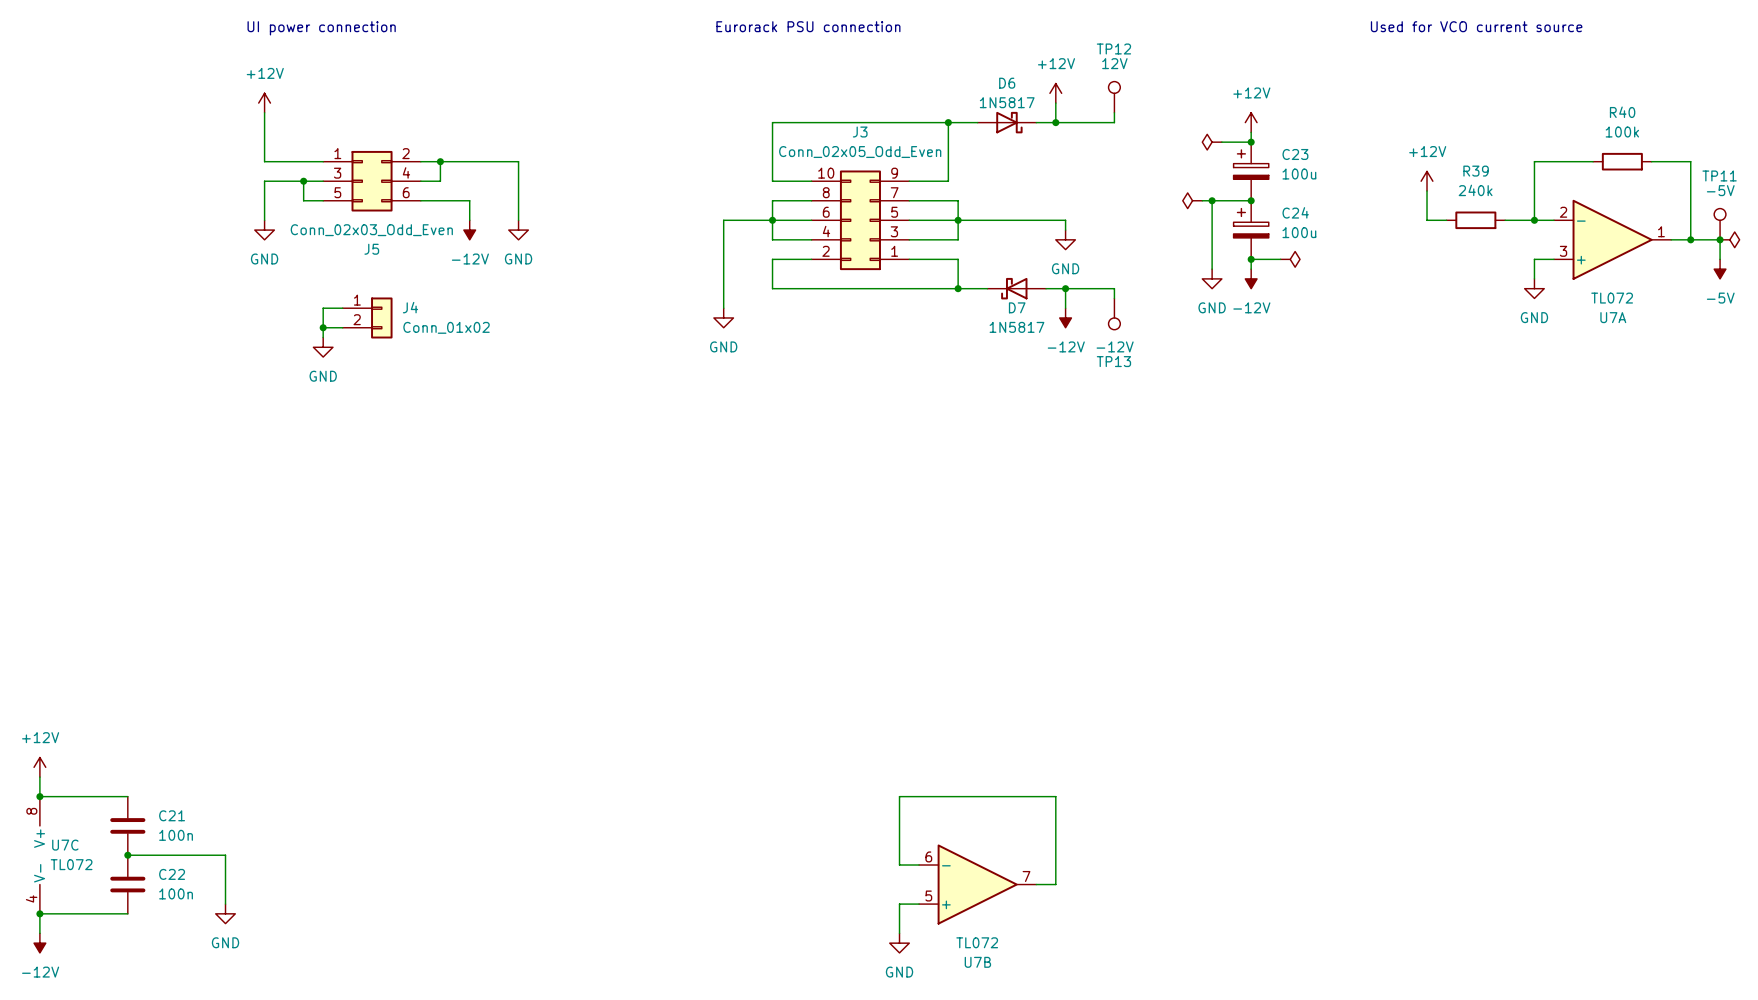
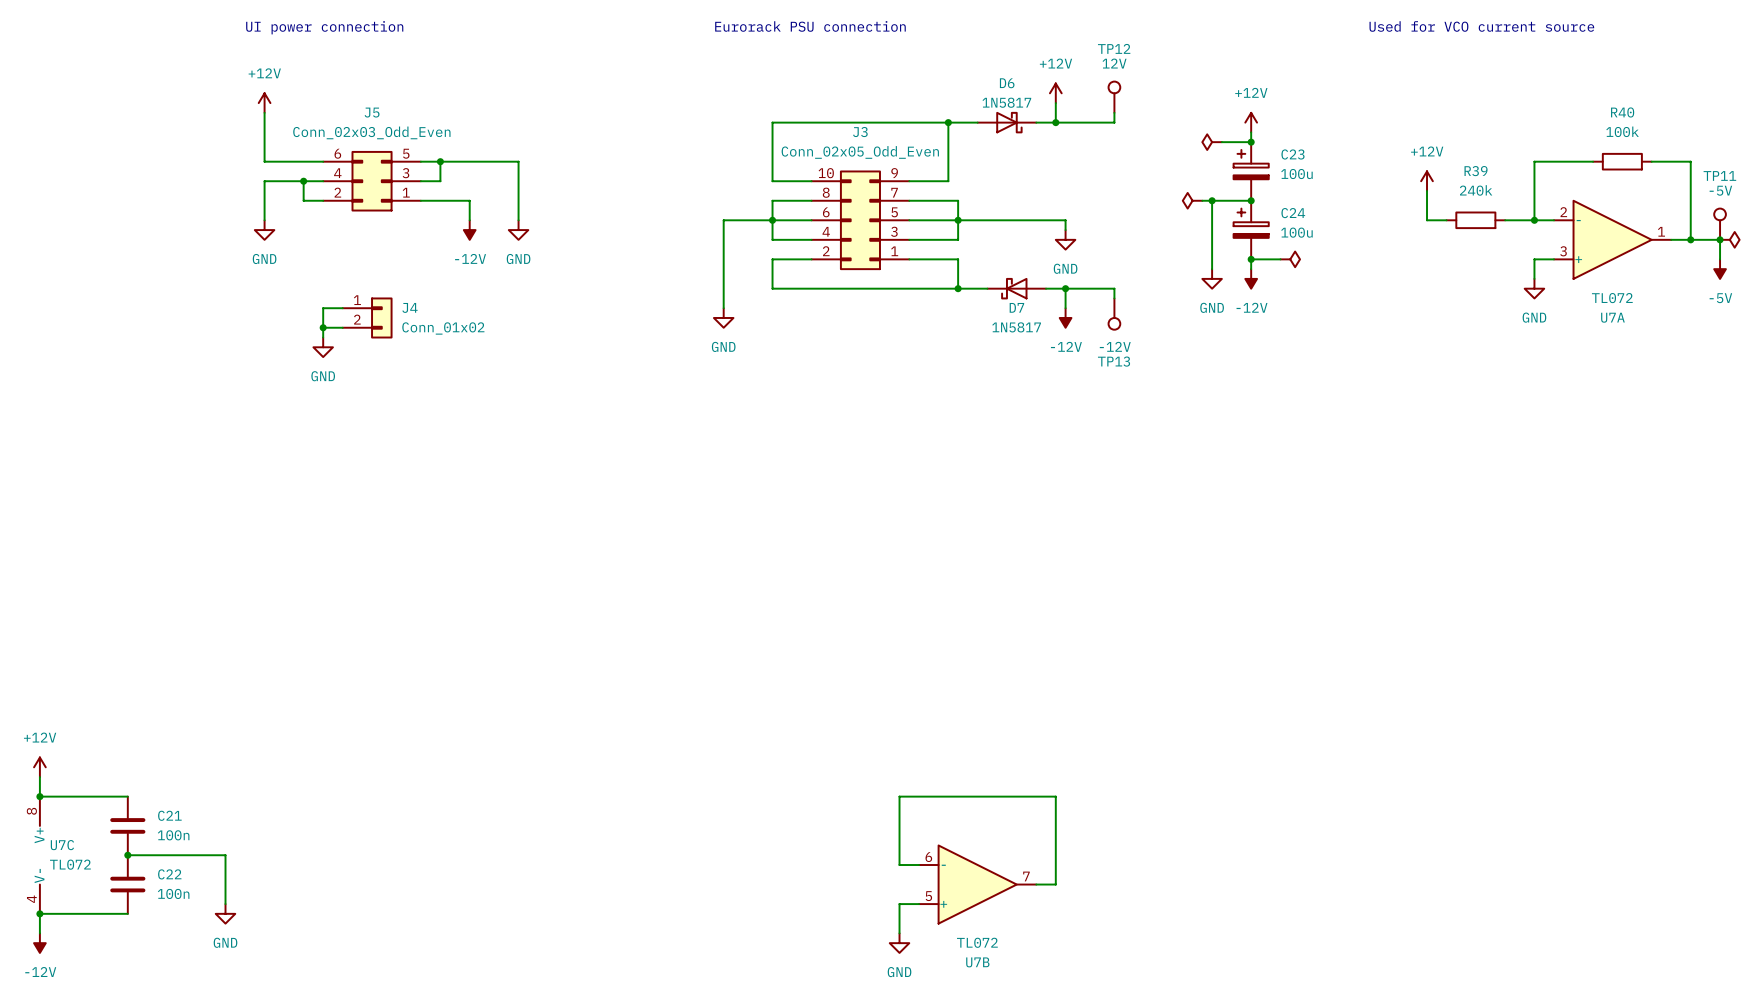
J5 rotation: 0° (372, 181) -> 180° (372, 181)

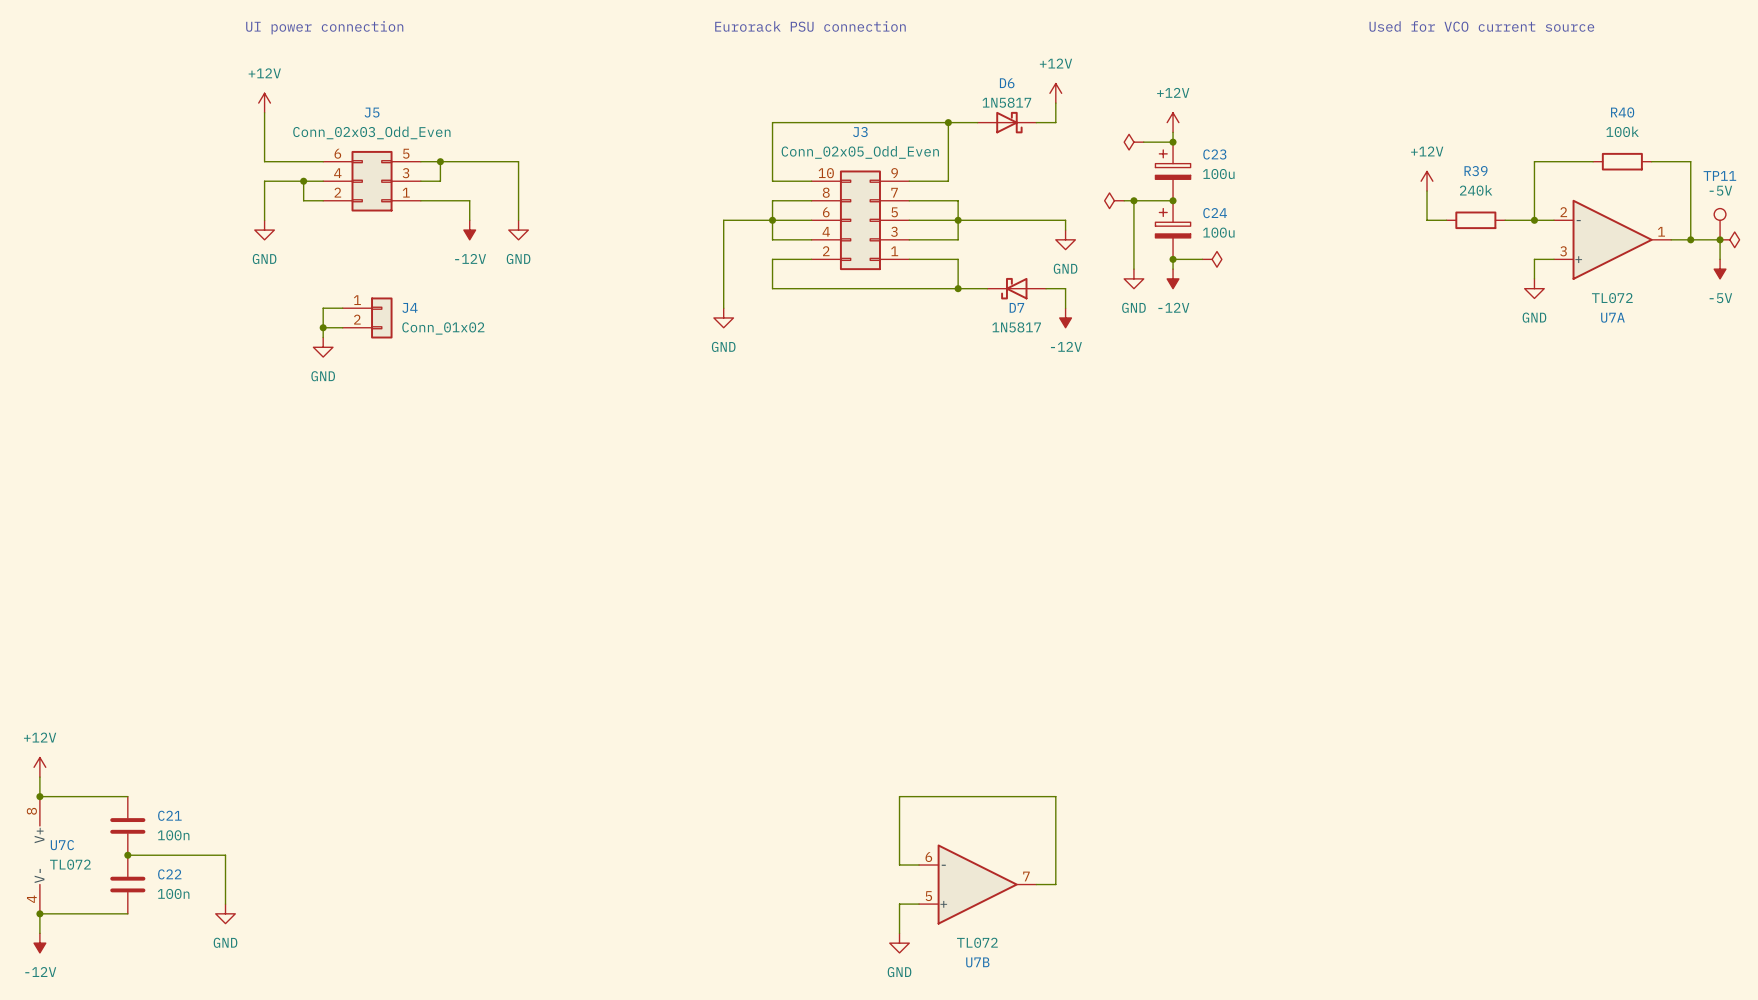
TP12: 12V (1114, 97) -> none
wire: (1114, 112) (1114, 122) (1055, 122) -> none
junction: (1055, 122) -> none
power symbol position: +12V (1251, 122) -> +12V (1173, 122)
wire: (1251, 132) (1251, 142) (1221, 142) -> (1173, 132) (1173, 142) (1143, 142)
power symbol: none -> (1133, 142)
junction: none -> (1173, 142)
power symbol: (1212, 142) -> none
junction: (1251, 142) -> none
C23 position: (1251, 171) -> (1173, 171)
power symbol: none -> (1114, 200)
junction: none -> (1133, 200)
junction: none -> (1173, 200)
power symbol: (1192, 200) -> none
wire: (1202, 200) (1251, 200) -> (1124, 200) (1173, 200)
wire: (1212, 200) (1212, 269) -> (1133, 200) (1133, 269)
junction: (1212, 200) -> none
junction: (1251, 200) -> none
C24 position: (1251, 230) -> (1173, 230)
junction: none -> (1173, 259)
power symbol: none -> (1212, 259)
junction: (1251, 259) -> none
wire: (1280, 259) (1251, 259) (1251, 269) -> (1202, 259) (1173, 259) (1173, 269)
power symbol: (1290, 259) -> none
power symbol position: GND (1212, 278) -> GND (1133, 278)
power symbol position: -12V (1251, 278) -> -12V (1173, 278)
wire: (1065, 288) (1114, 288) (1114, 298) -> none
junction: (1065, 288) -> none
TP13: -12V (1114, 314) -> none

